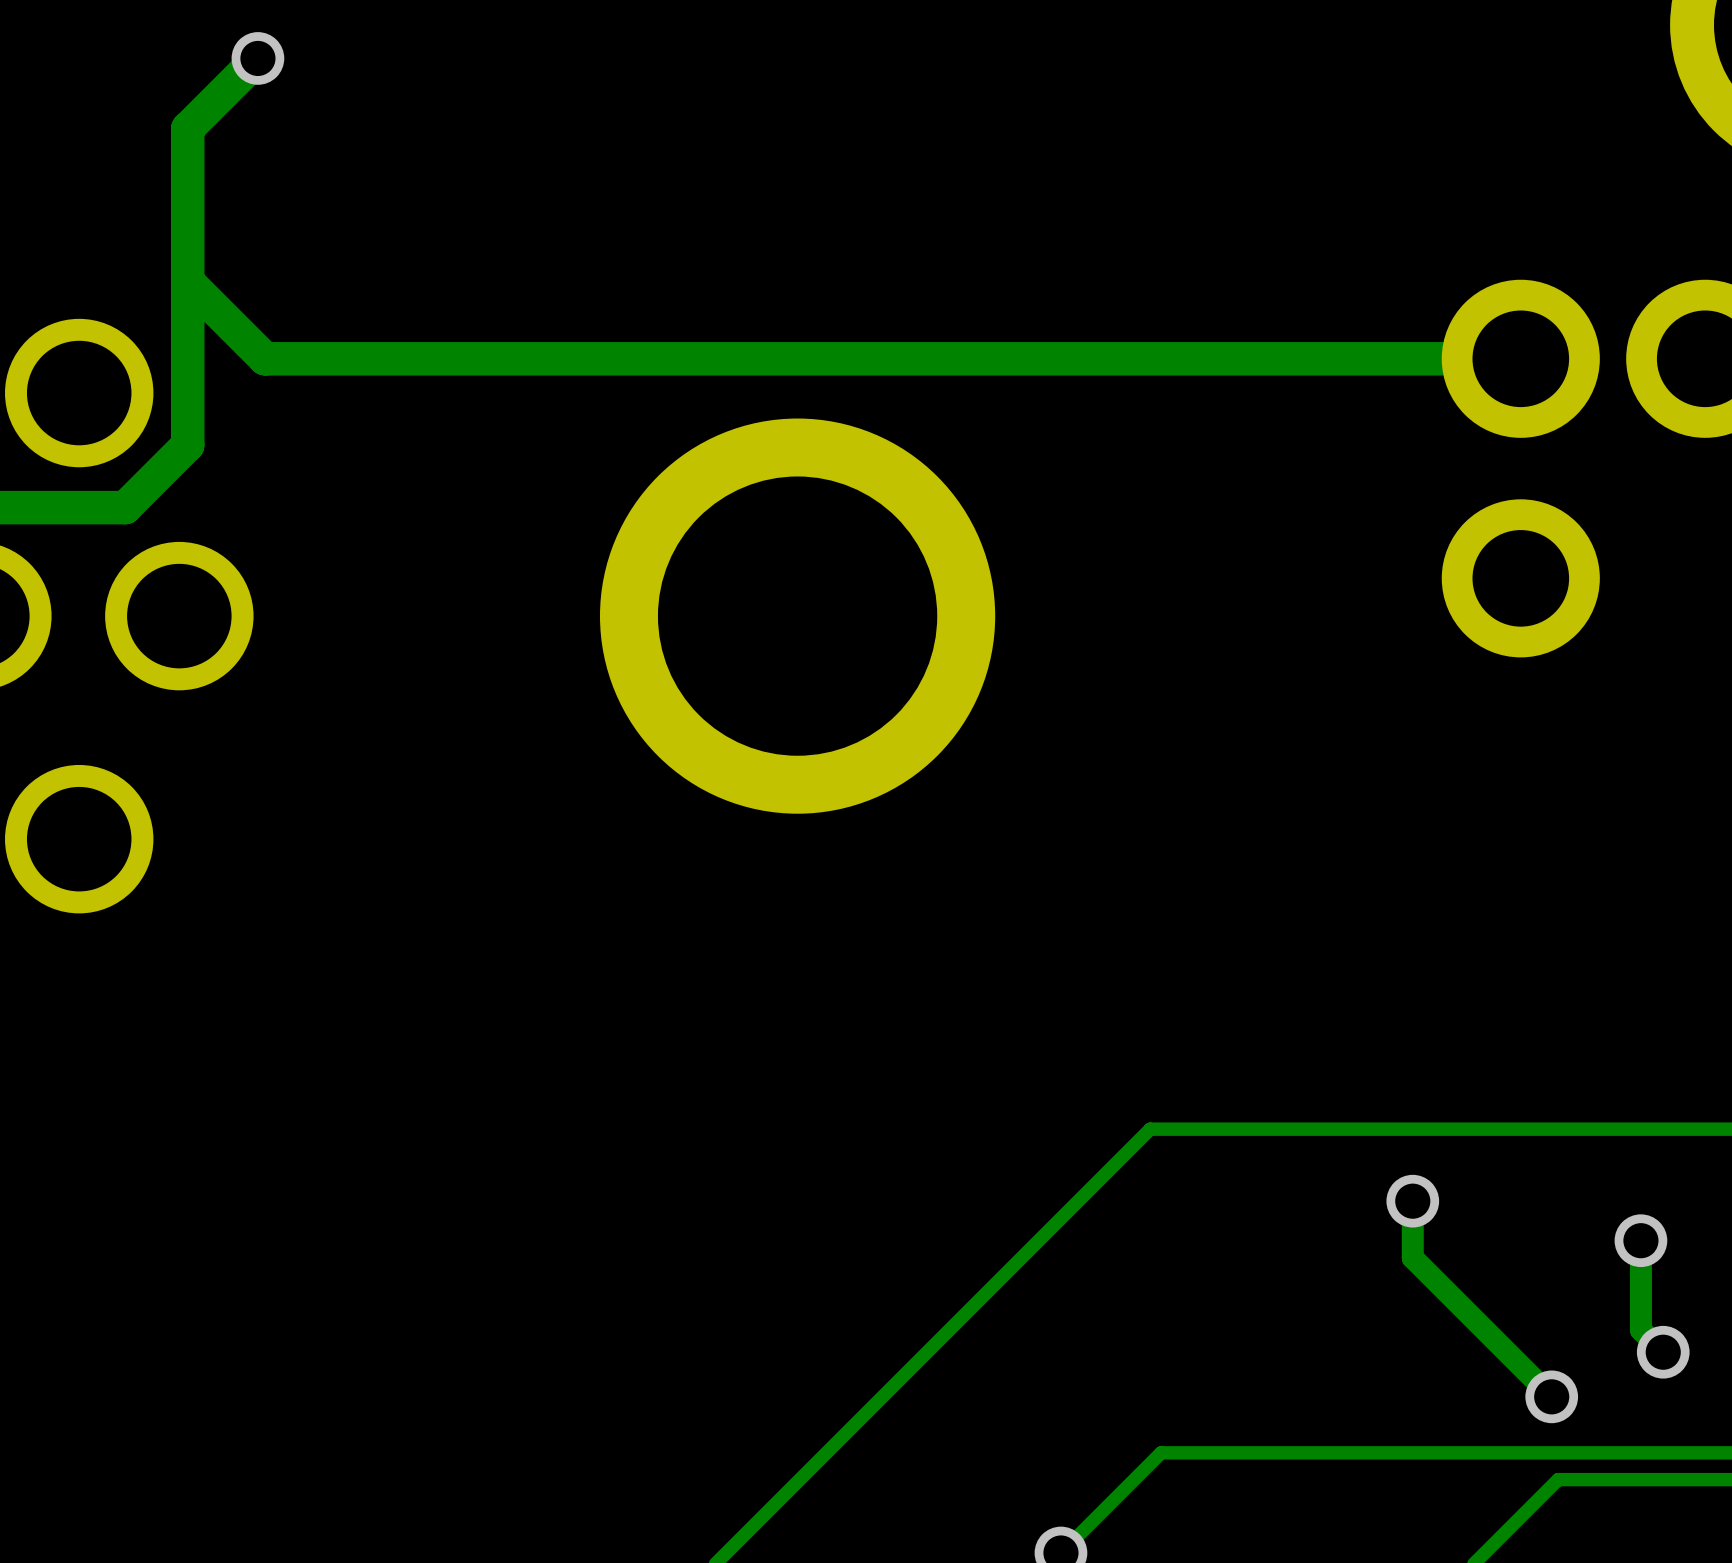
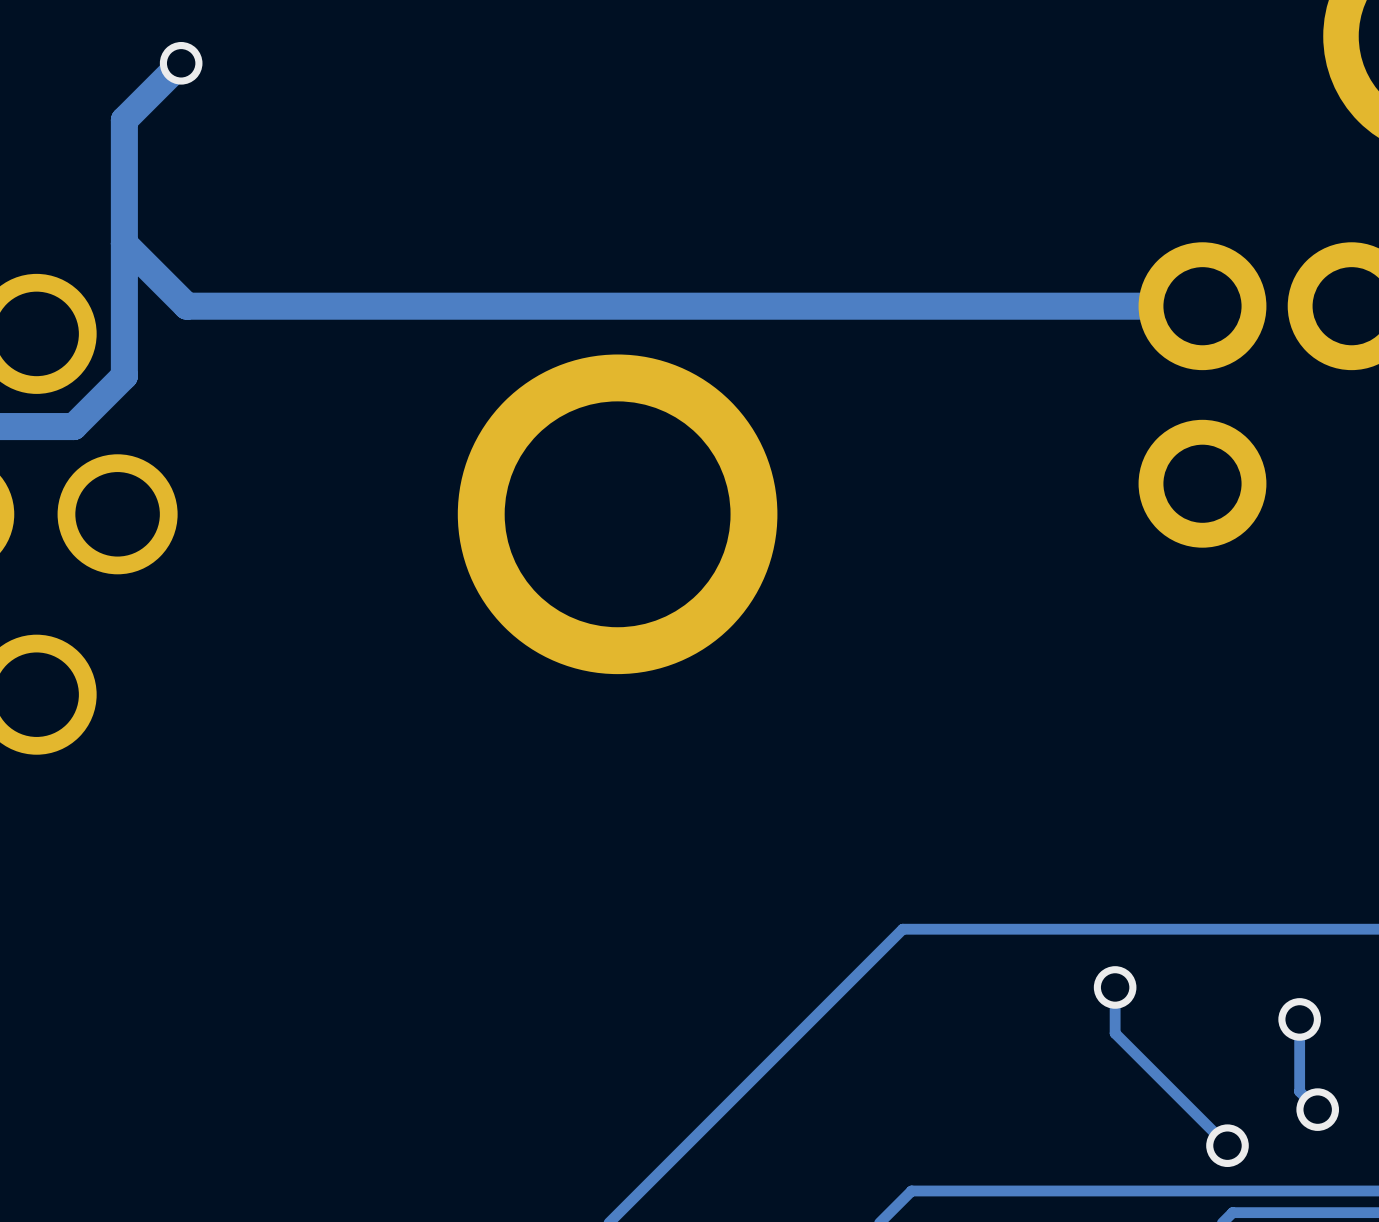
track width: thick (1412, 1201) (1412, 1257) (1551, 1396) -> thin (1115, 987) (1115, 1033) (1227, 1145)
track width: thick (1640, 1240) (1640, 1329) (1663, 1352) -> thin (1299, 1019) (1299, 1091) (1317, 1109)

